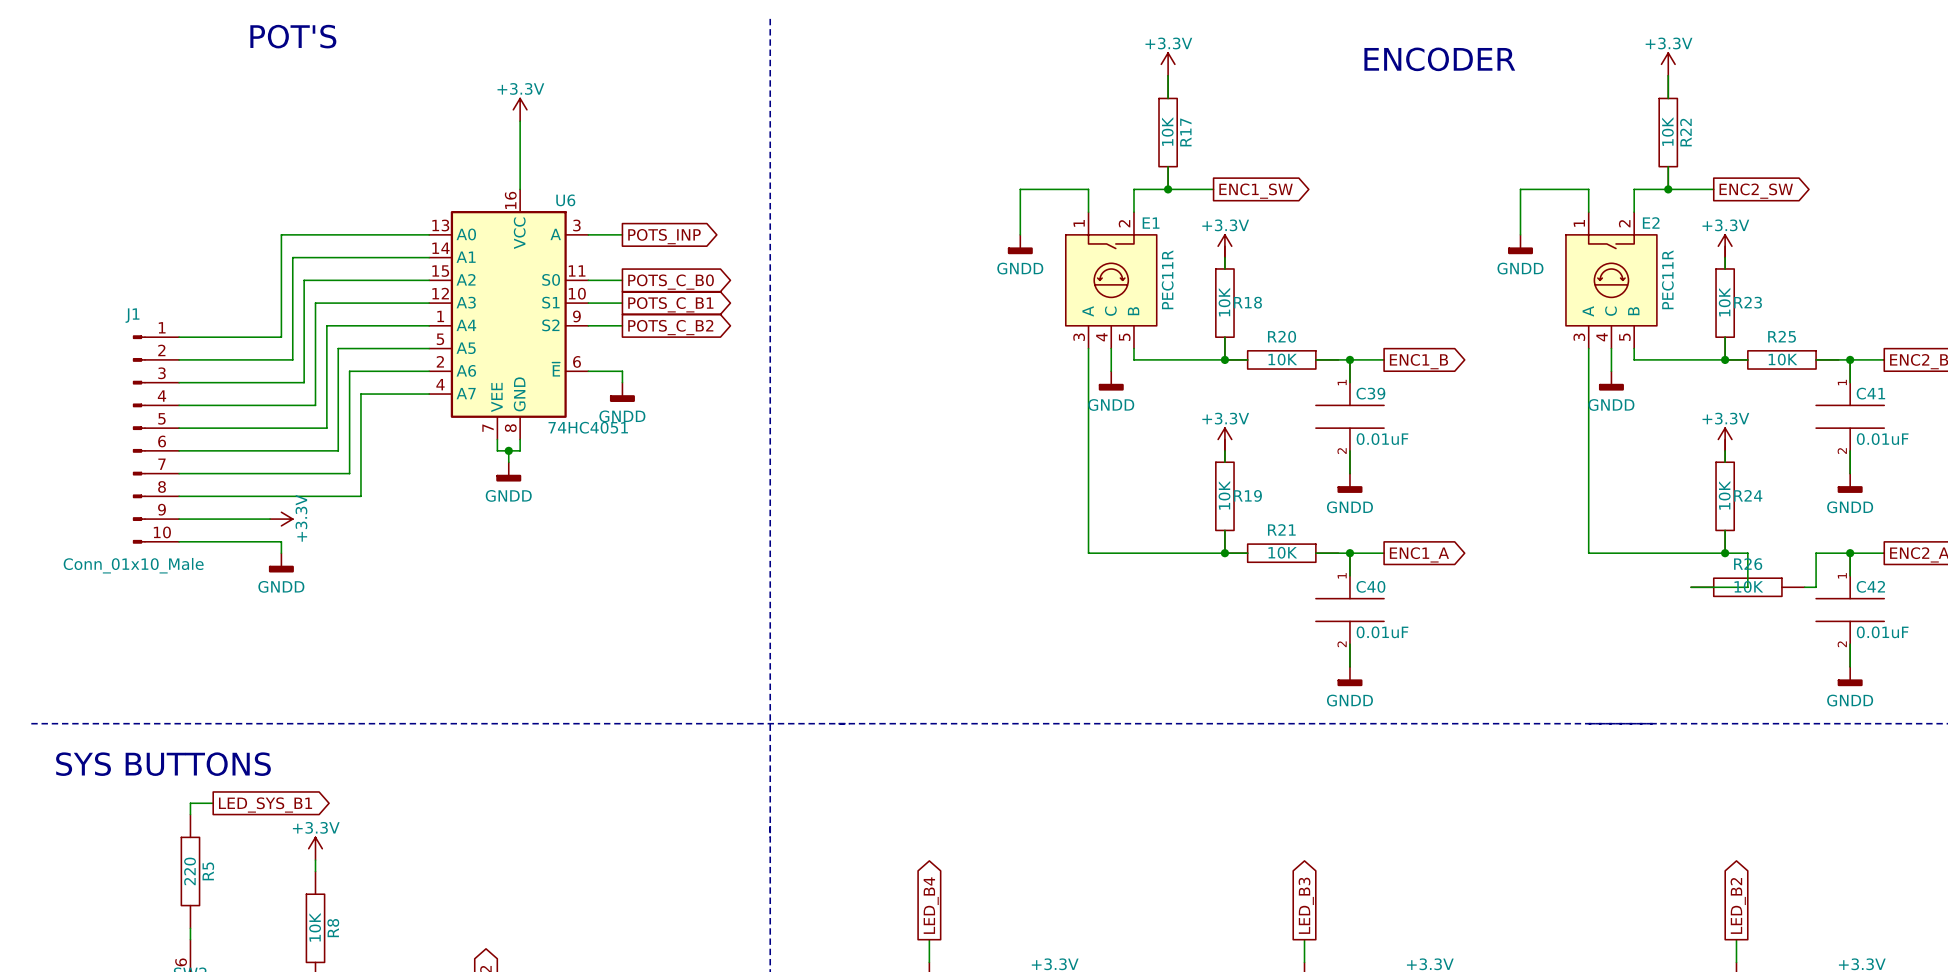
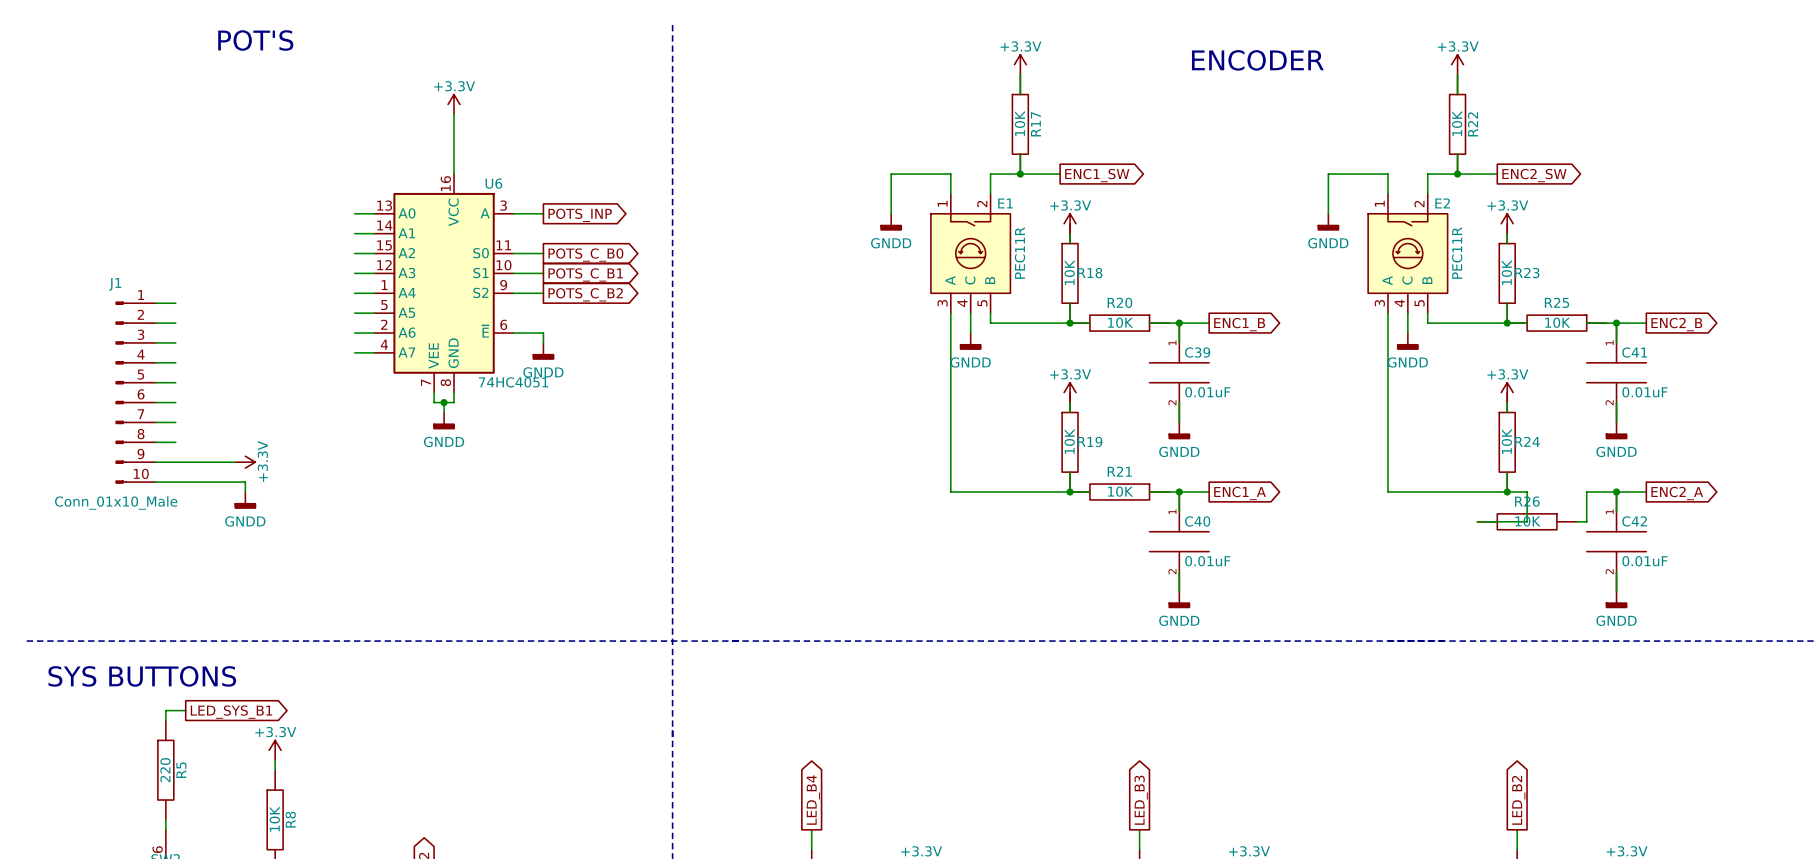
wire: (406, 234) (281, 234) (281, 337) (201, 337) -> none
wire: (406, 257) (292, 257) (292, 359) (201, 359) -> none
wire: (406, 280) (304, 280) (304, 382) (201, 382) -> none
wire: (406, 303) (315, 303) (315, 405) (201, 405) -> none
wire: (406, 325) (326, 325) (326, 428) (201, 428) -> none
wire: (406, 348) (338, 348) (338, 450) (201, 450) -> none
wire: (406, 371) (349, 371) (349, 473) (201, 473) -> none
wire: (406, 394) (360, 394) (360, 496) (201, 496) -> none

